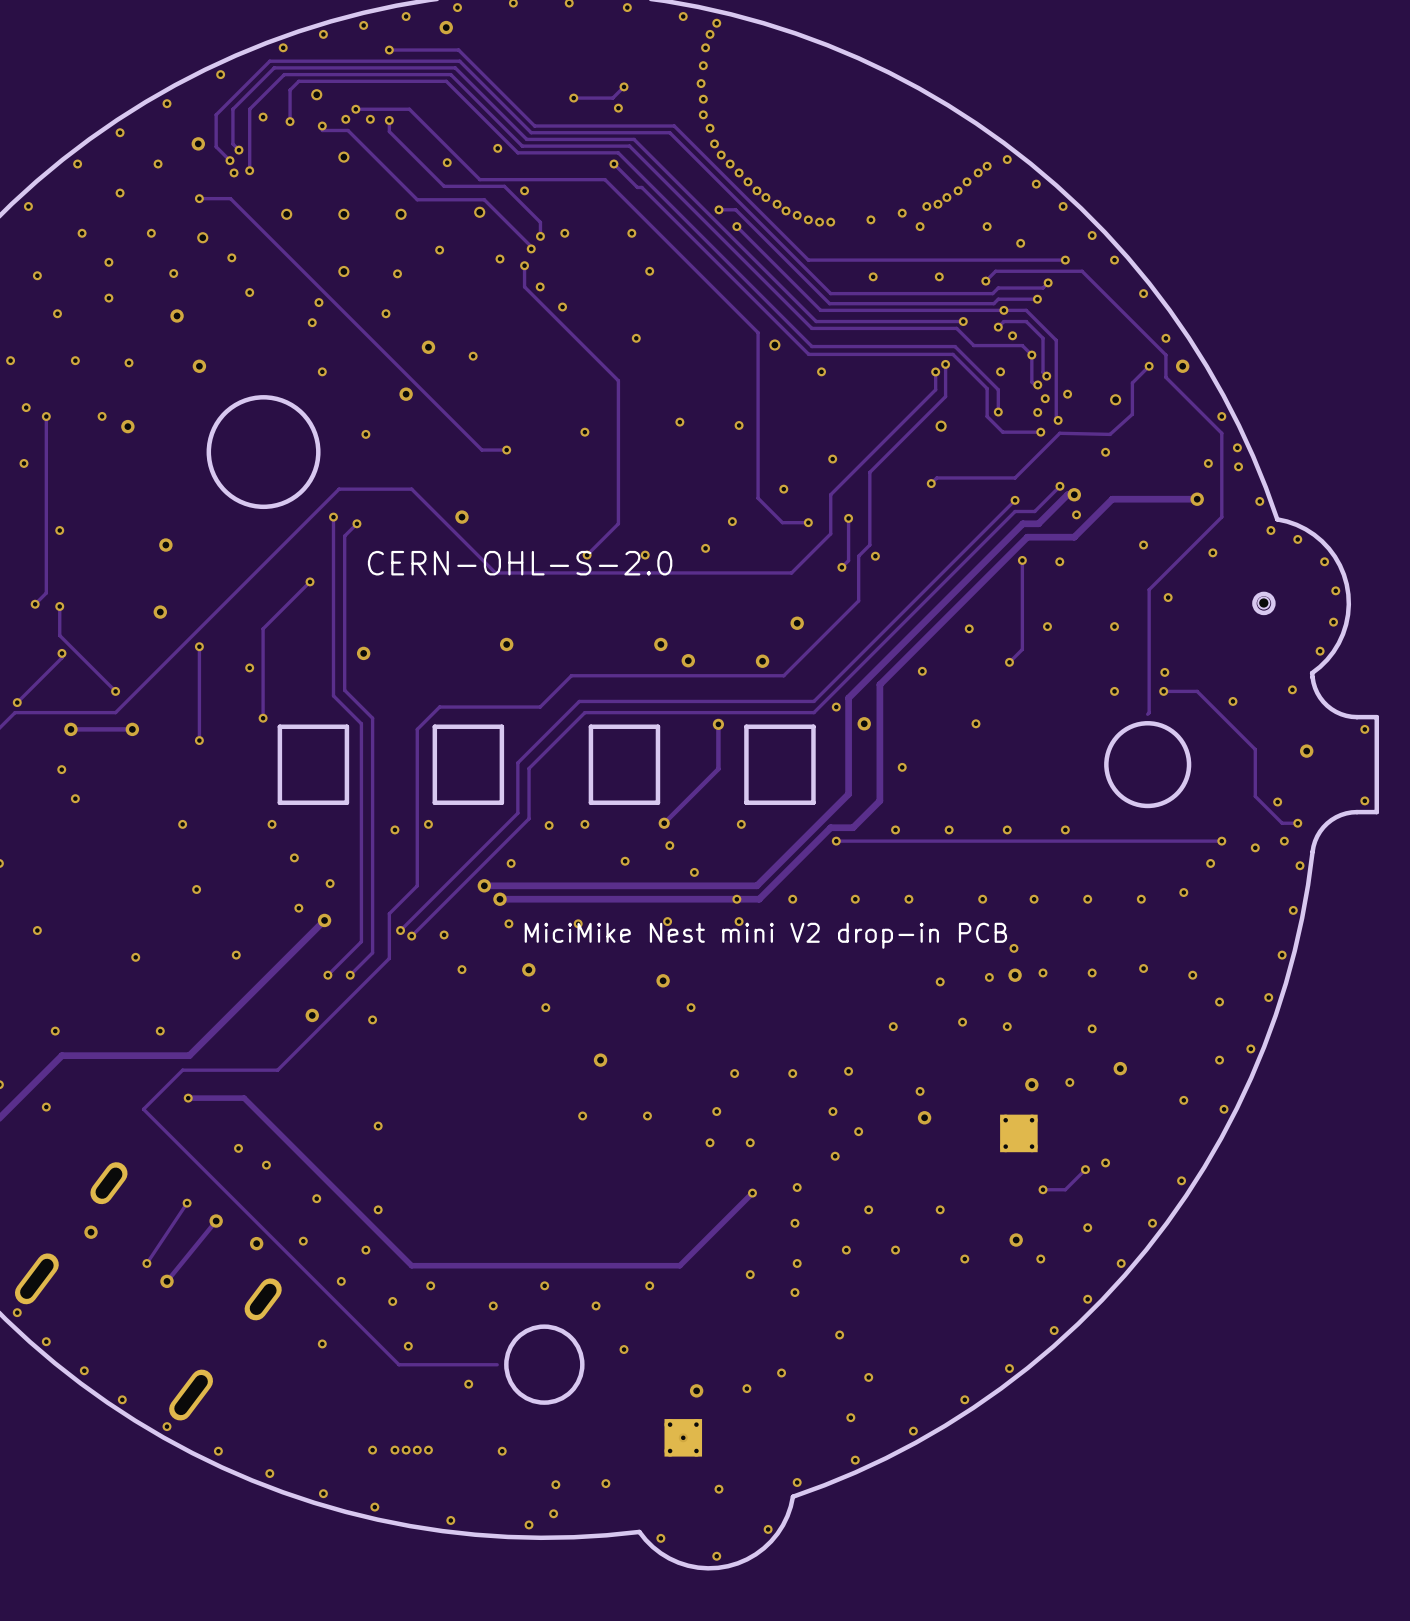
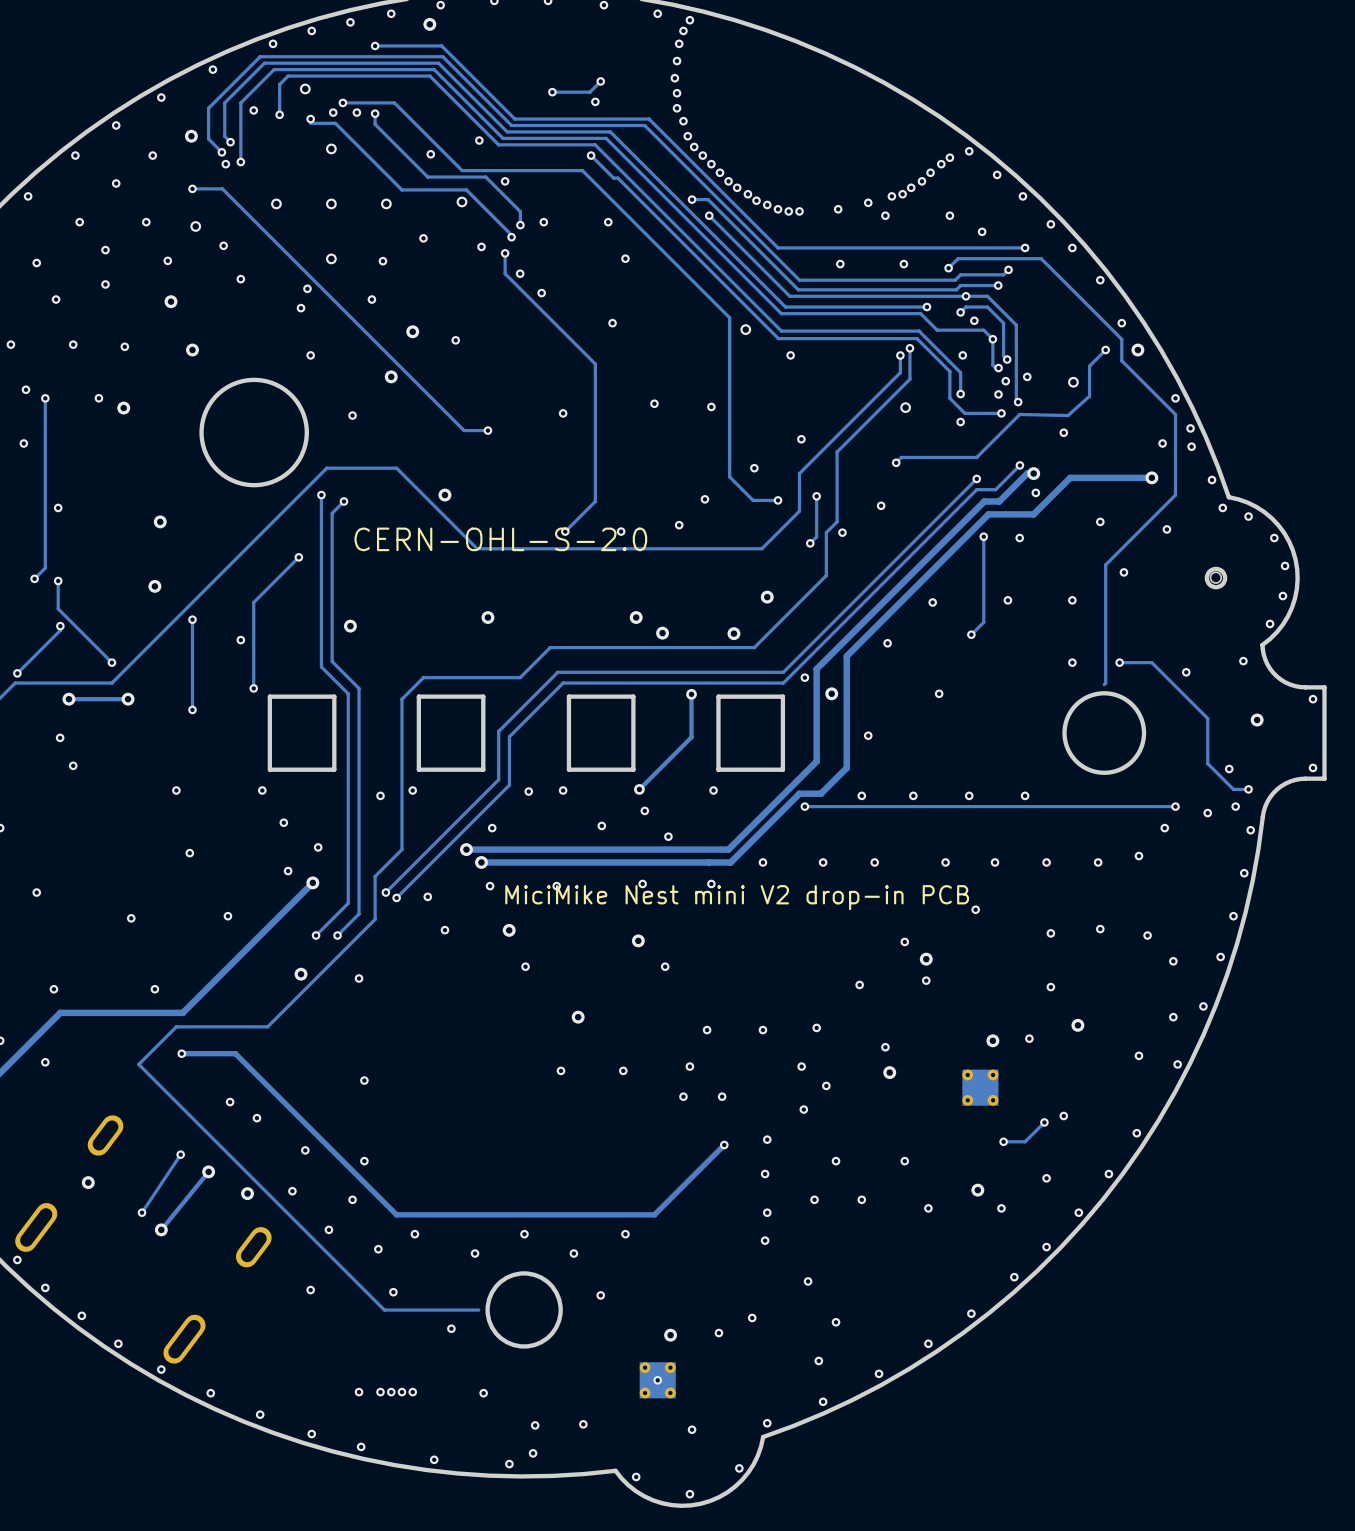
via: none -> (960, 422)
via: none -> (881, 505)
via: (1164, 672) -> none
via: (736, 899) -> none
via: (1043, 972) -> none
via position: (1015, 975) -> (926, 959)
via: (989, 977) -> none
via: (1007, 1026) -> none
via: (750, 1274) -> none

